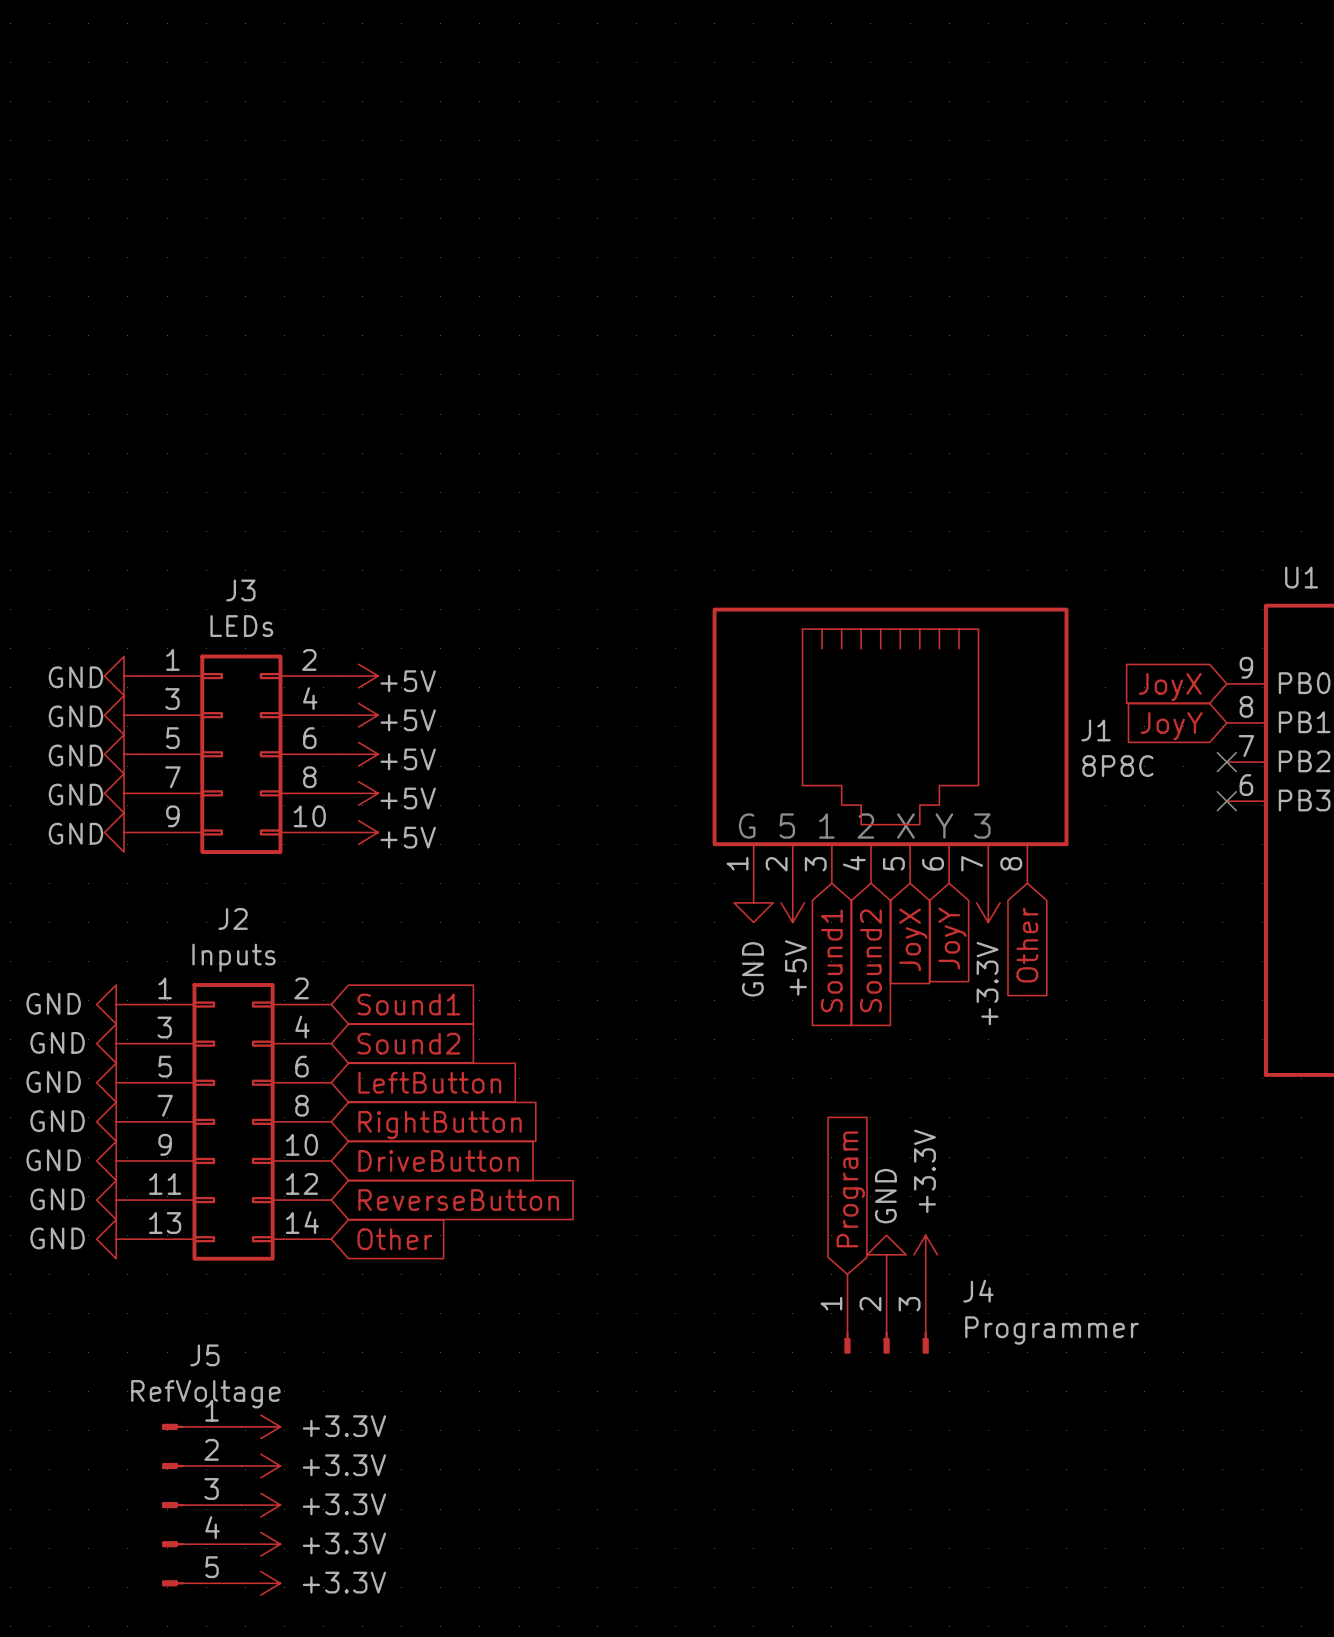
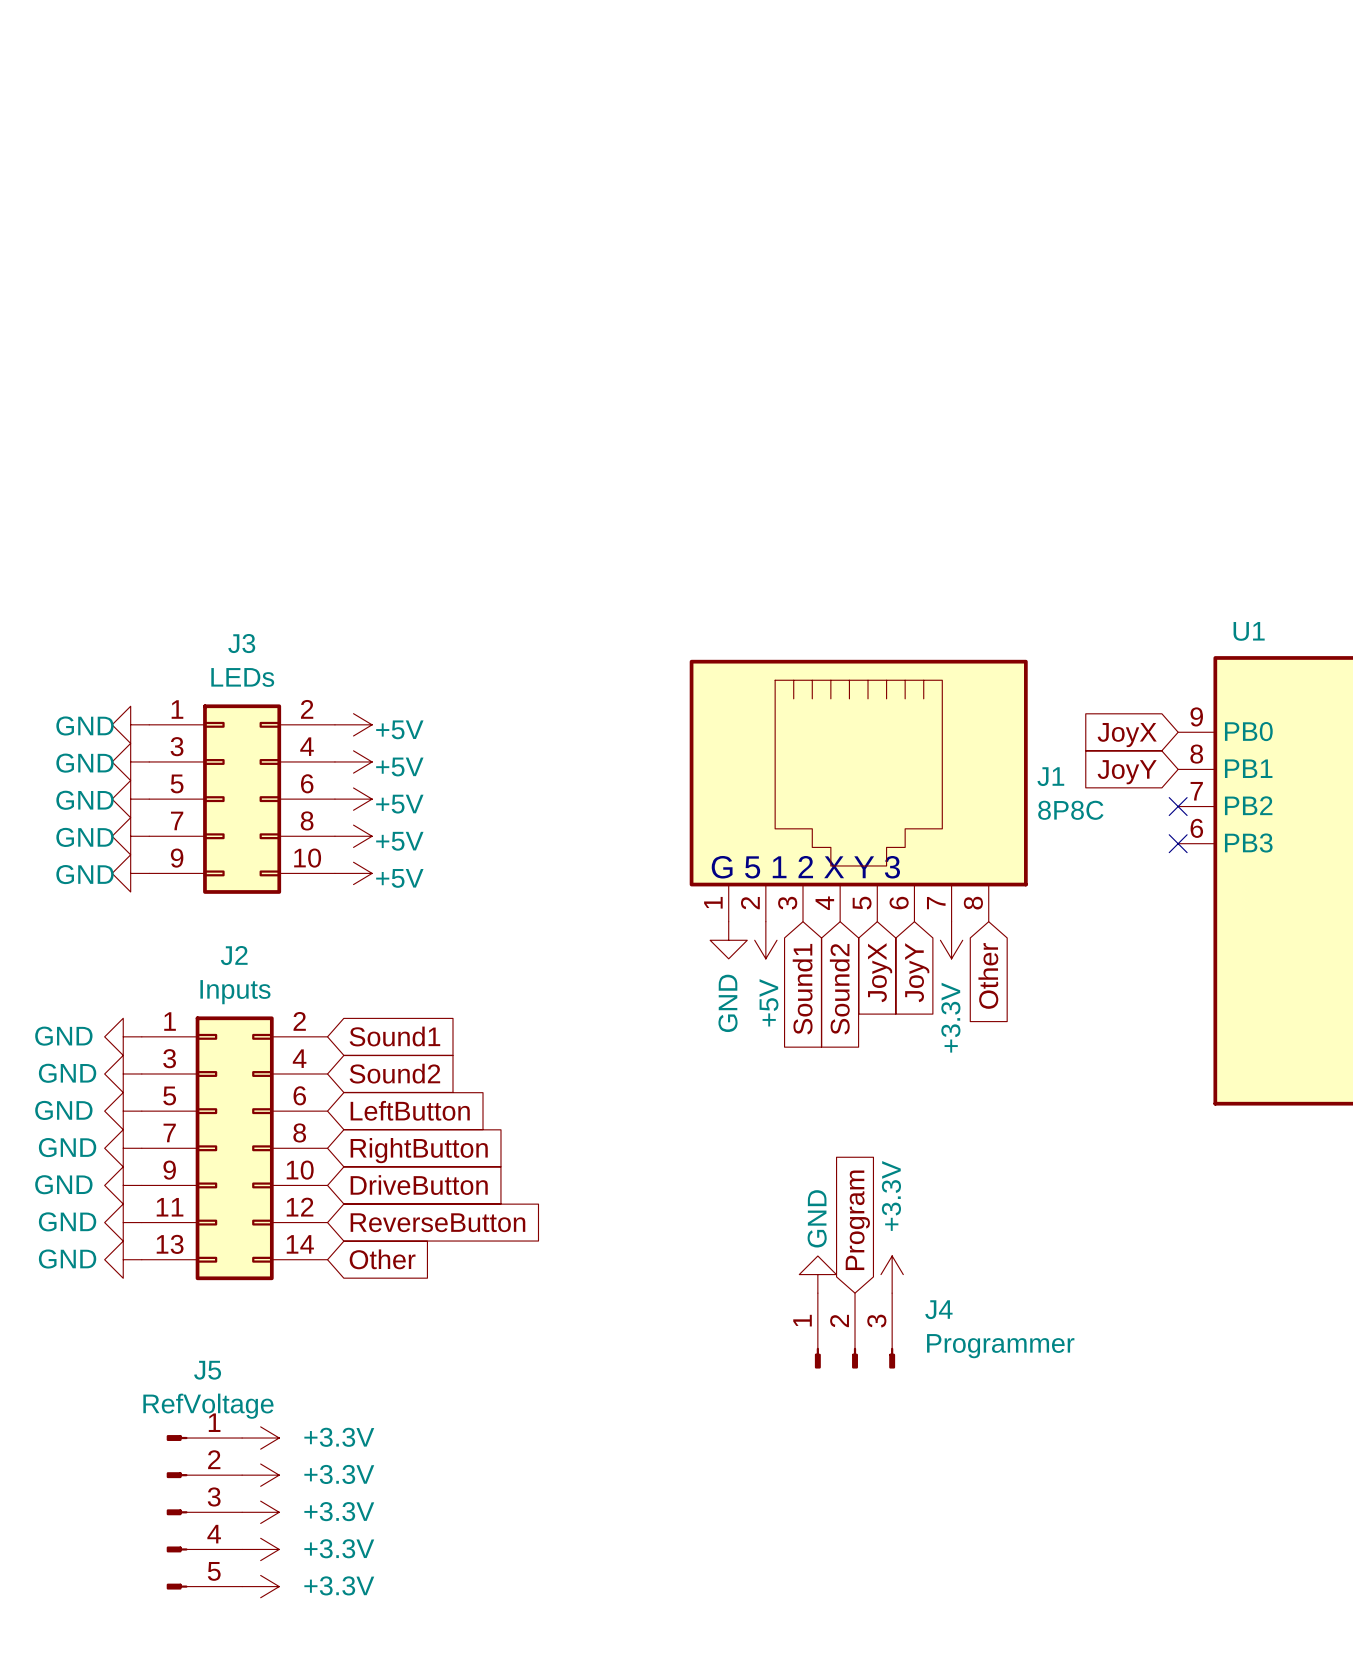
global label position: Program (850, 1189) -> Program (857, 1220)
power symbol position: GND (886, 1254) -> GND (817, 1274)

